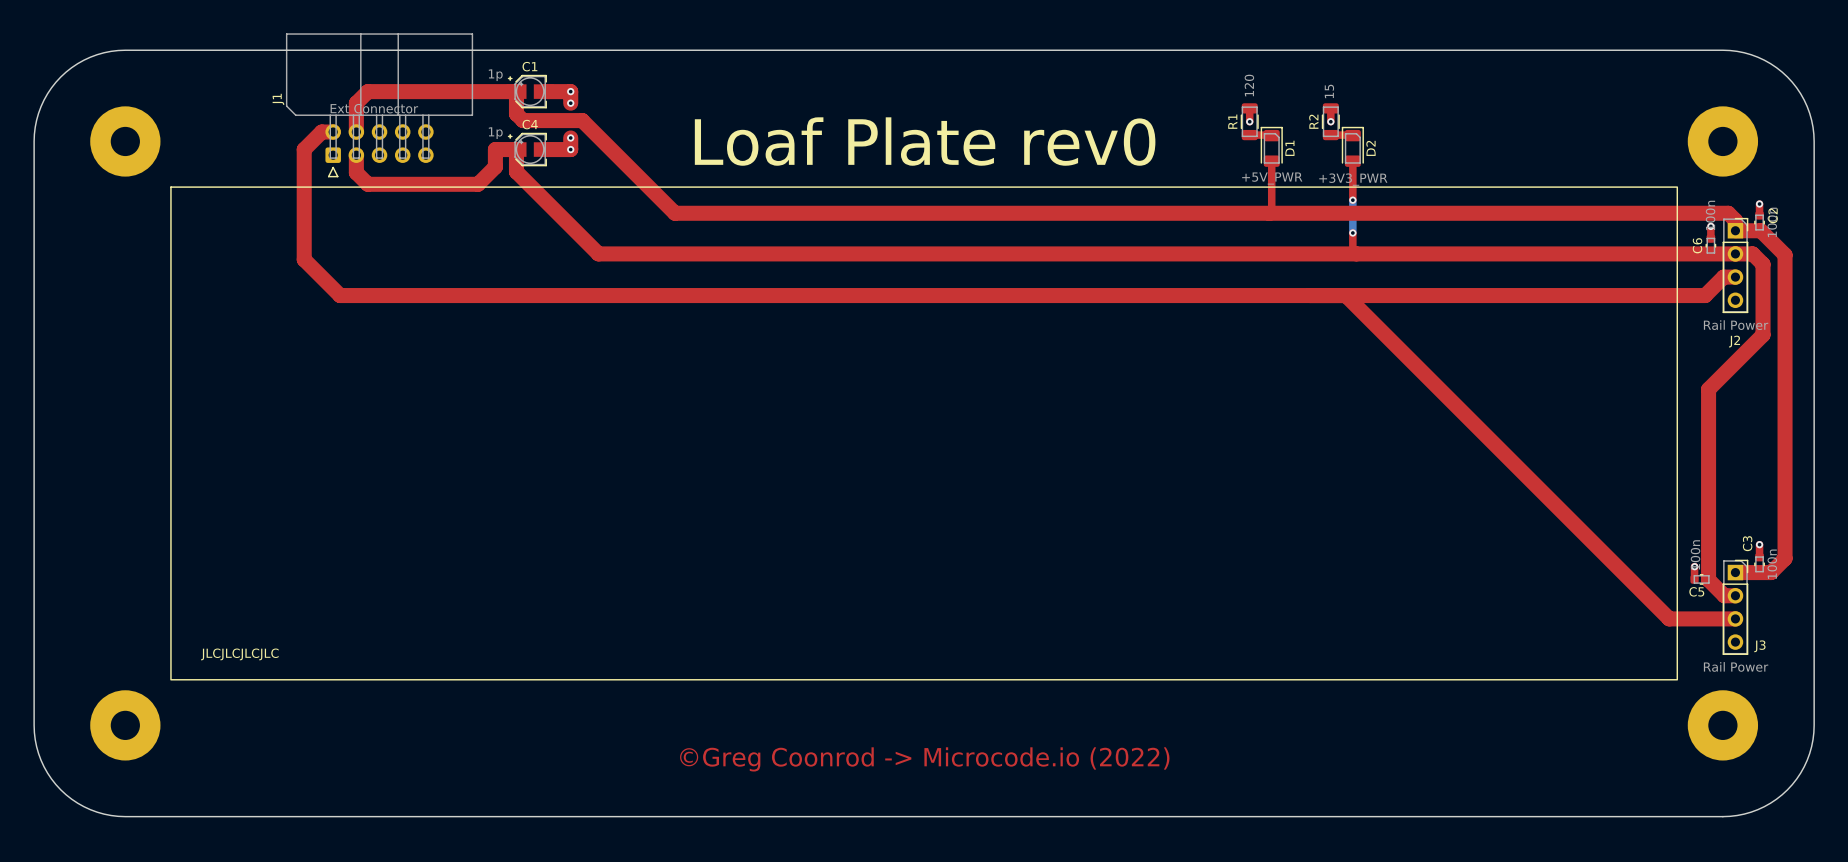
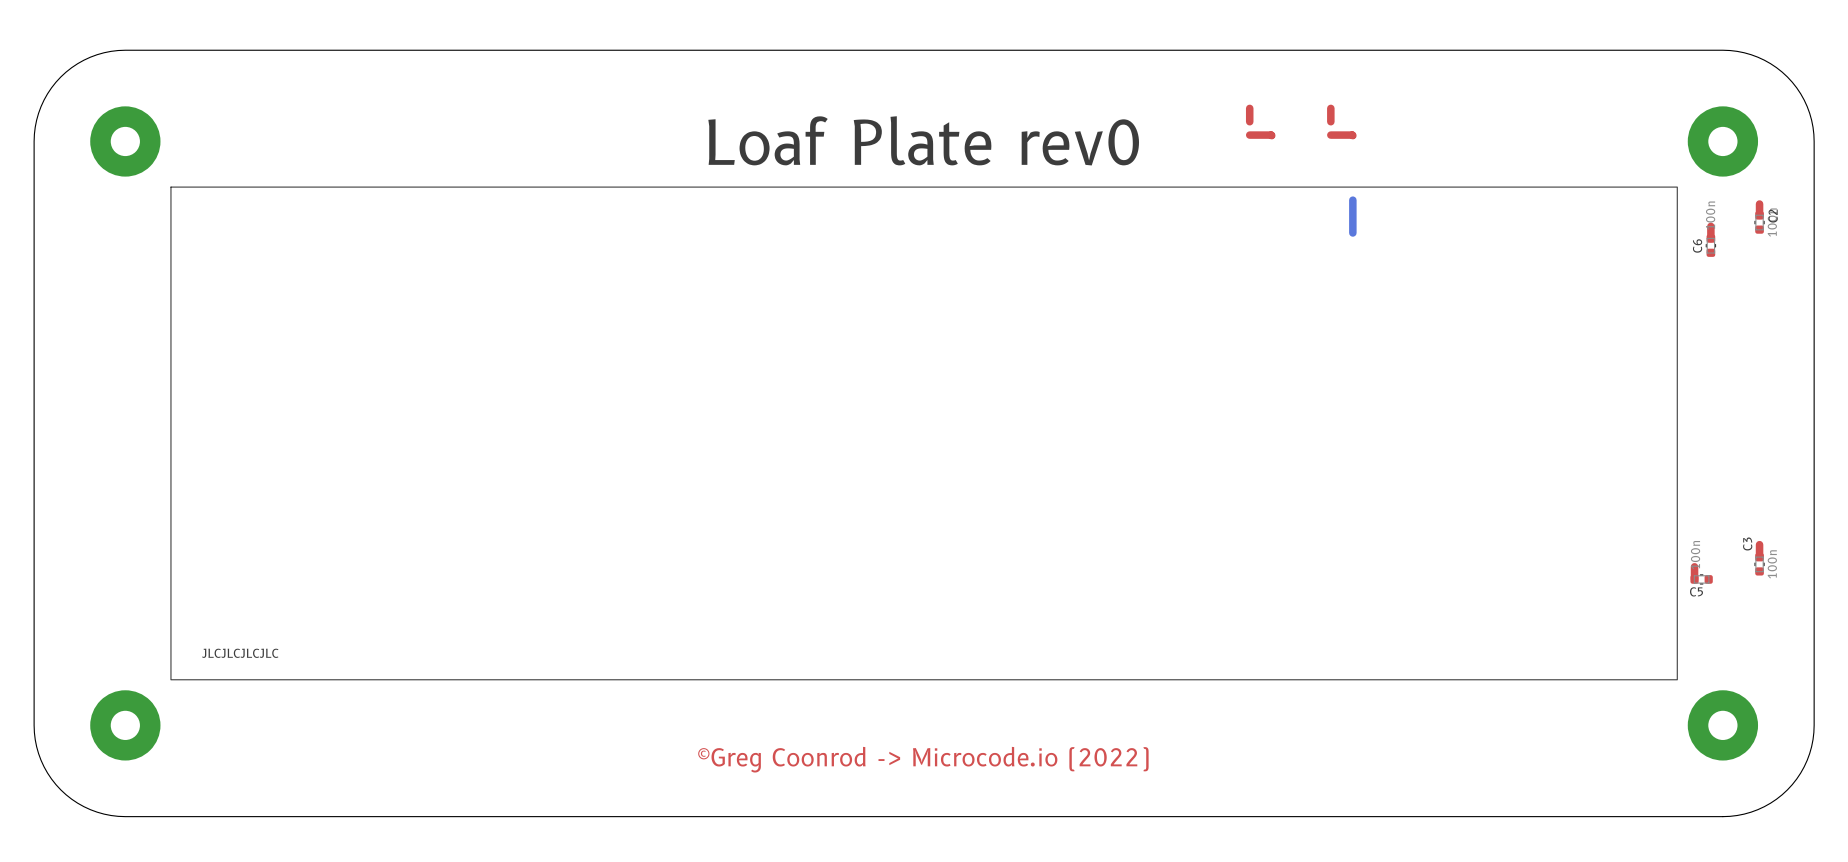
C1: 1p (530, 91) -> none
top track: (543, 91) (570, 91) (570, 103) -> none
via: (570, 91) -> none
via: (570, 103) -> none
J1: Ext Connector (379, 105) -> none
R1: 120 (1249, 121) -> none
via: (1249, 121) -> none
R2: 15 (1330, 121) -> none
via: (1330, 121) -> none
top track: (333, 132) (321, 132) (304, 149) (304, 259) (340, 295) (1705, 295) (1723, 277) (1735, 277) -> none
top track: (356, 132) (356, 103) (367, 91) (516, 91) (516, 113) (523, 120) (582, 120) (675, 213) (1728, 213) (1735, 220) (1735, 230) (1760, 230) (1785, 254) (1785, 558) (1771, 572) (1735, 572) -> none
top track: (570, 137) (570, 149) (543, 149) -> none
via: (570, 137) -> none
D1: +5V_PWR (1271, 146) -> none
D2: +3V3_PWR (1352, 146) -> none
C4: 1p (530, 149) -> none
via: (570, 149) -> none
top track: (356, 155) (356, 172) (367, 184) (478, 184) (495, 166) (495, 149) (516, 149) (516, 171) (598, 253) (1752, 253) (1763, 264) (1763, 334) (1708, 389) (1708, 579) (1724, 595) (1735, 595) -> none
top track: (1271, 161) (1271, 210) (1269, 213) -> none
top track: (1352, 161) (1352, 200) -> none
via: (1352, 200) -> none
via: (1759, 204) -> none
via: (1710, 226) -> none
top track: (1352, 232) (1352, 250) (1356, 253) -> none
via: (1352, 232) -> none
J2: Rail Power (1735, 265) -> none
top track: (1345, 295) (1669, 618) (1735, 618) -> none
via: (1759, 544) -> none
via: (1694, 566) -> none
J3: Rail Power (1735, 607) -> none

